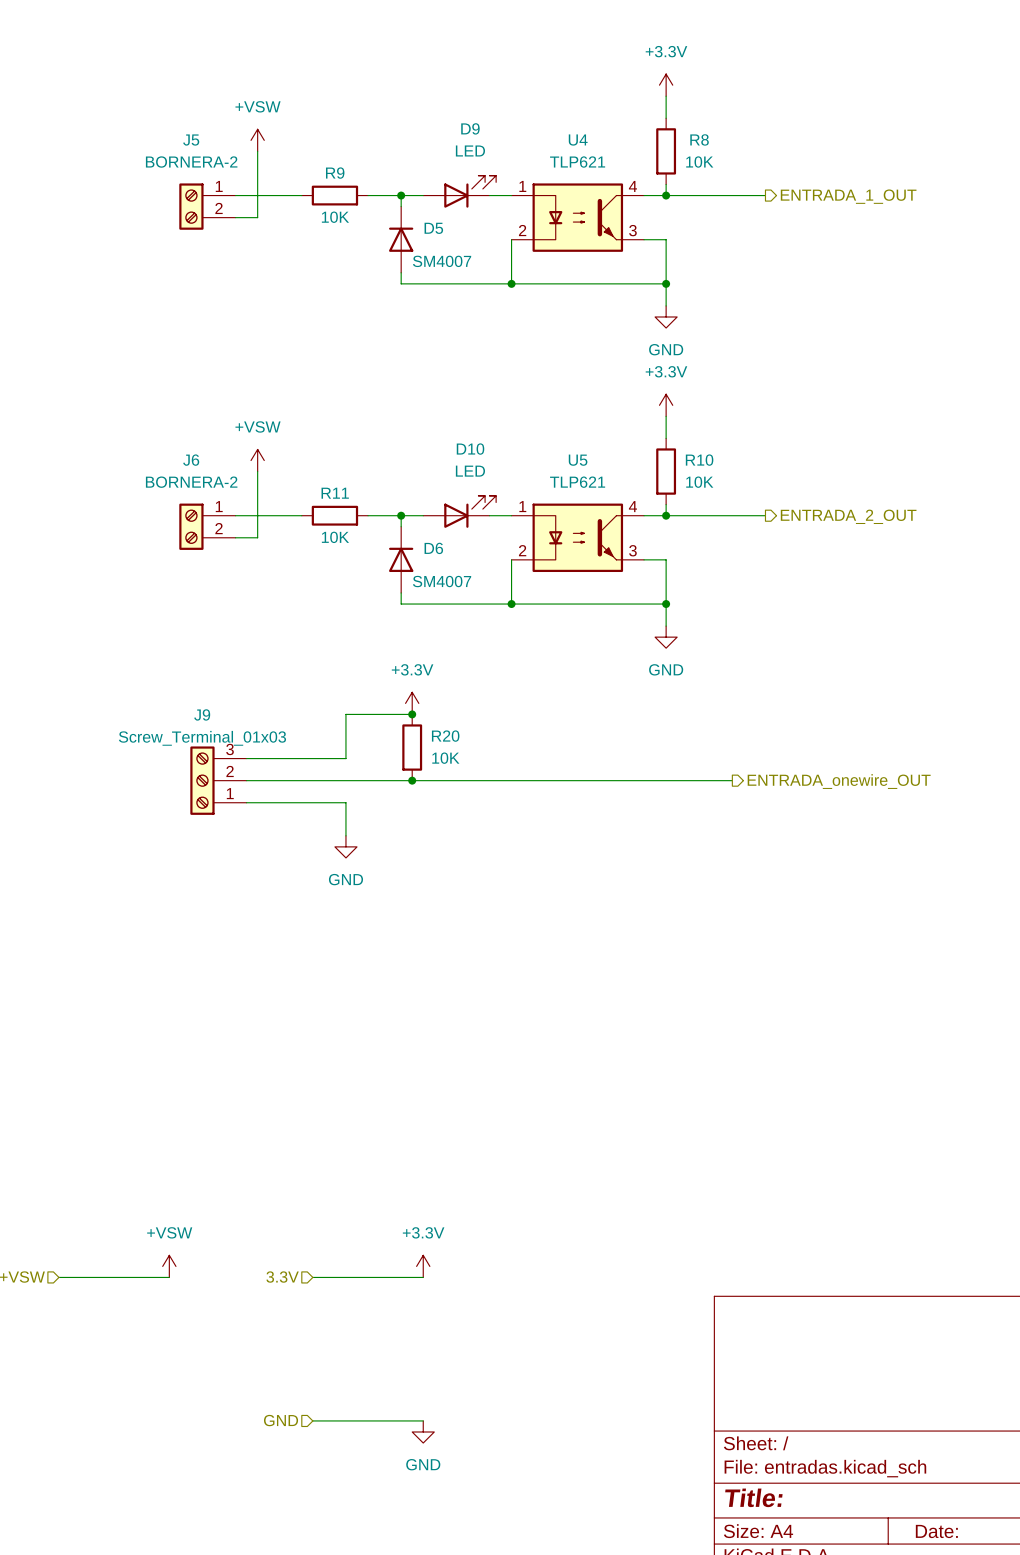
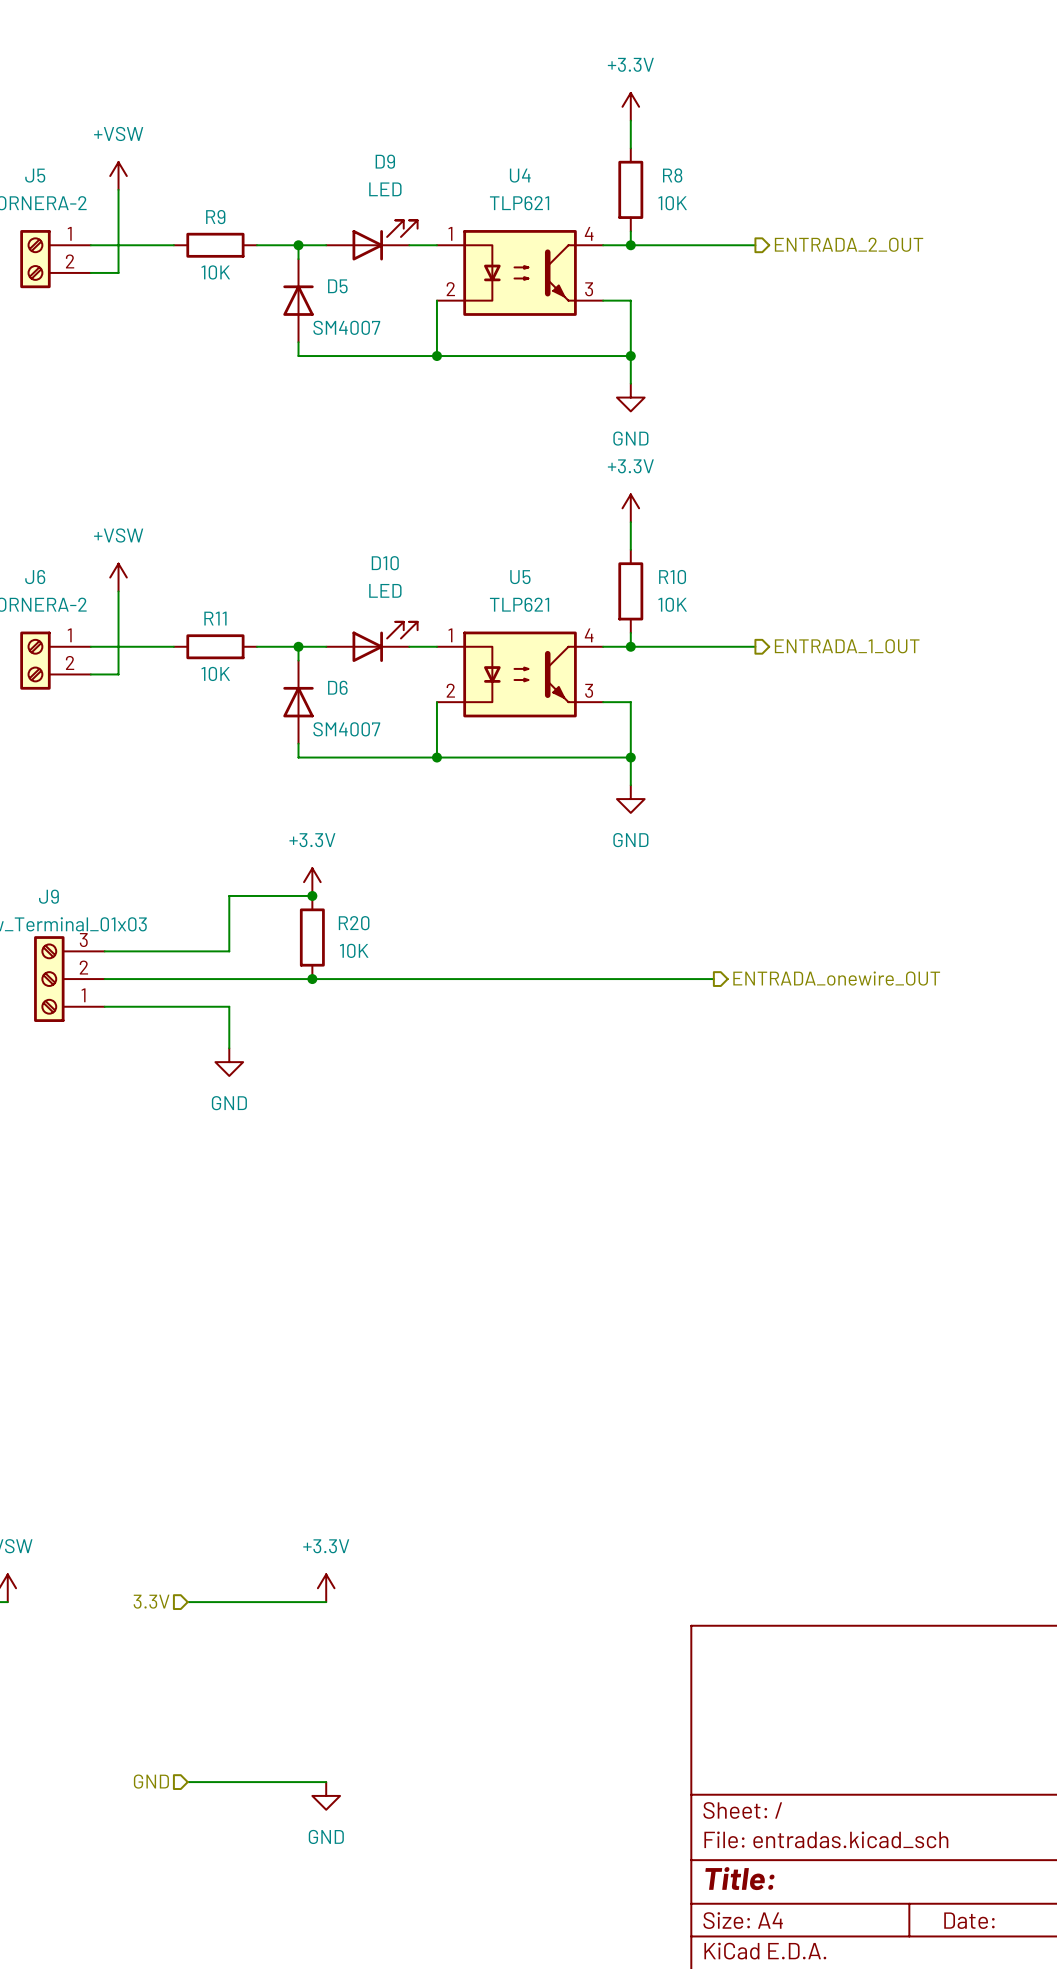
hierarchical label: ENTRADA_1_OUT (848, 196) -> ENTRADA_2_OUT (849, 244)
hierarchical label: ENTRADA_2_OUT (848, 516) -> ENTRADA_1_OUT (847, 646)

